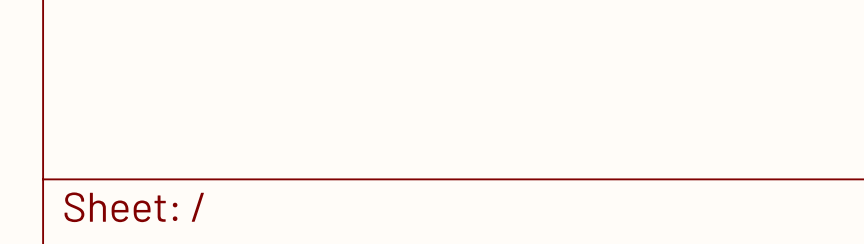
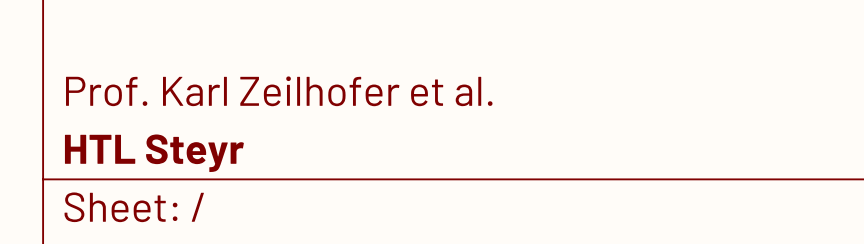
title block: none -> Prof. Karl Zeilhofer et al. (279, 91)
title block: none -> HTL Steyr (154, 153)

